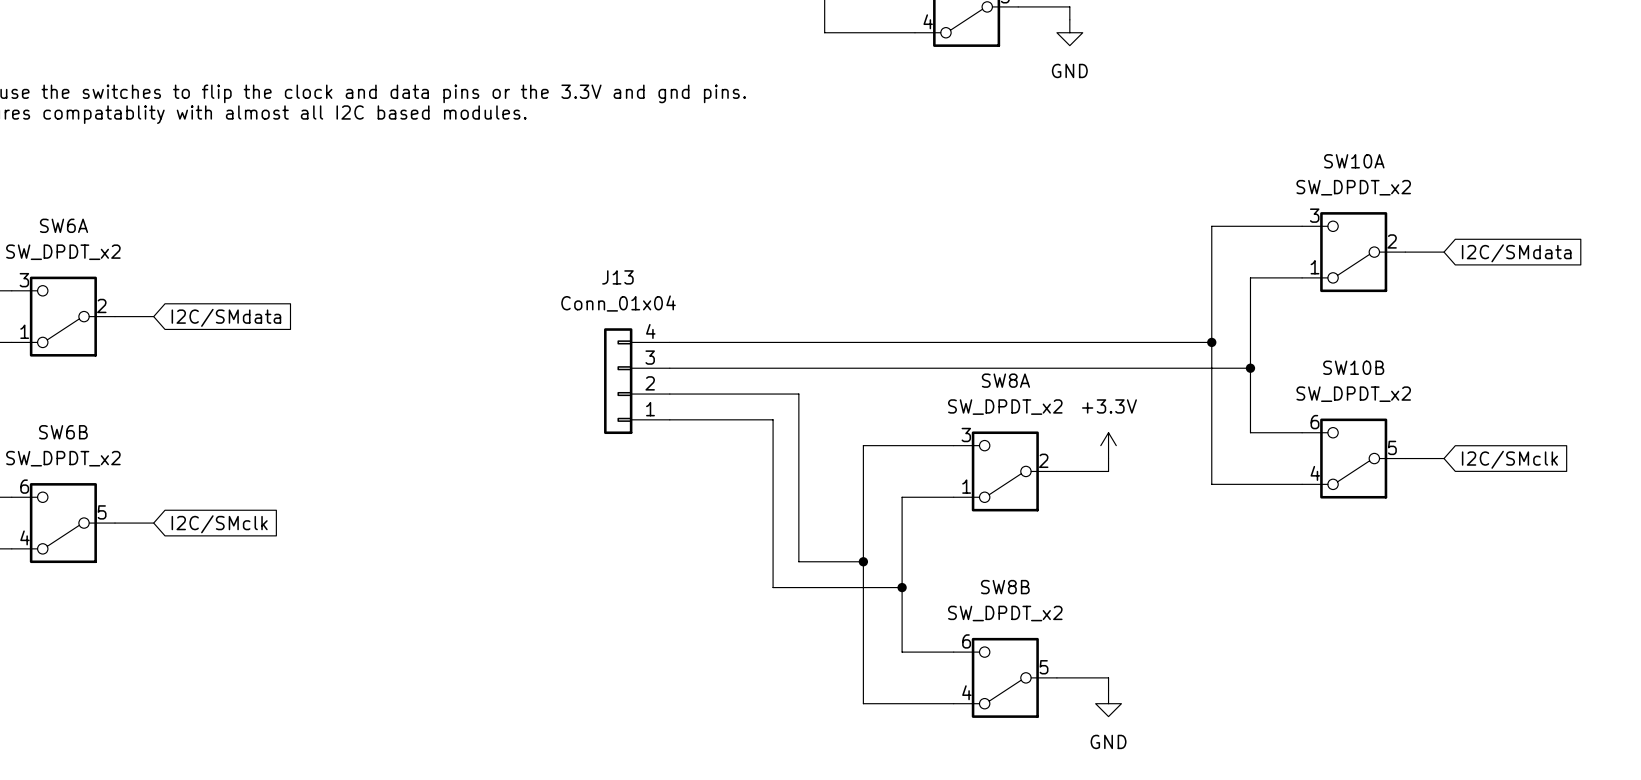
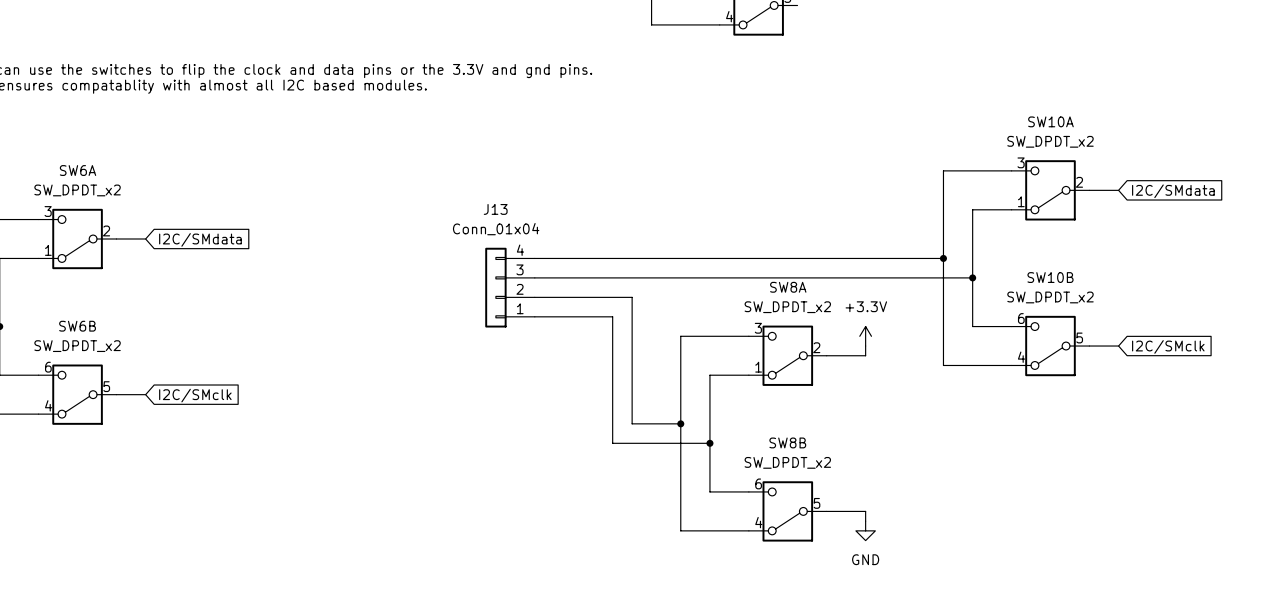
wire: (1018, 6) (1069, 6) (1069, 19) -> none
power symbol: GND (1069, 32) -> none

